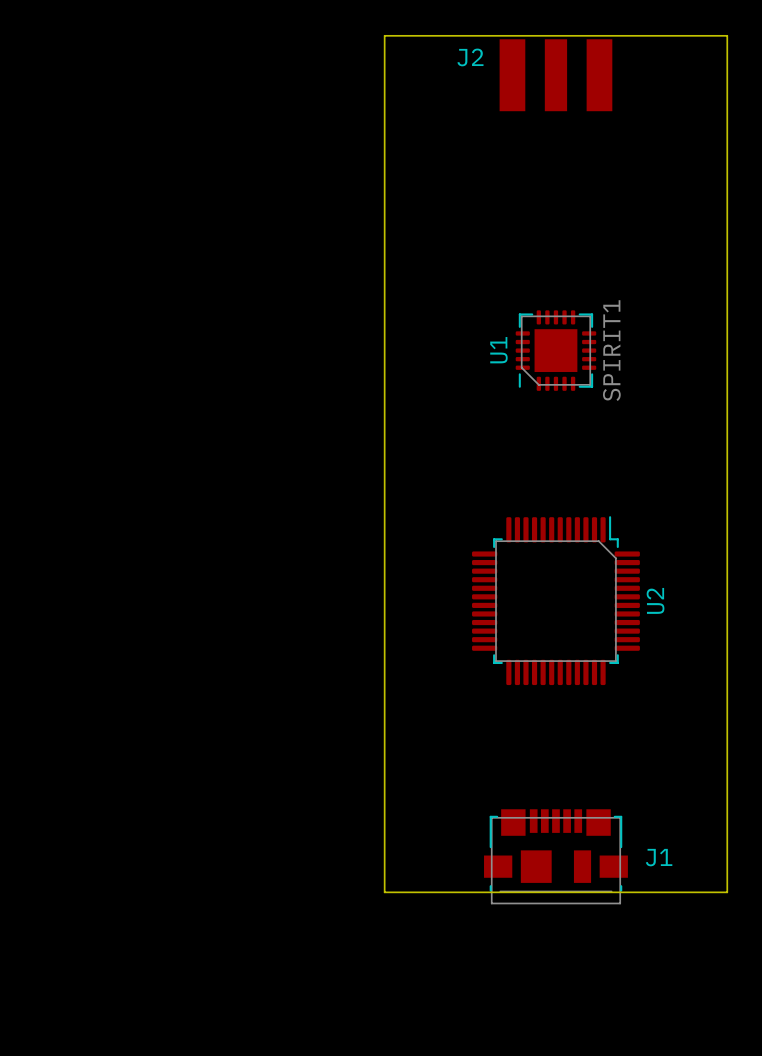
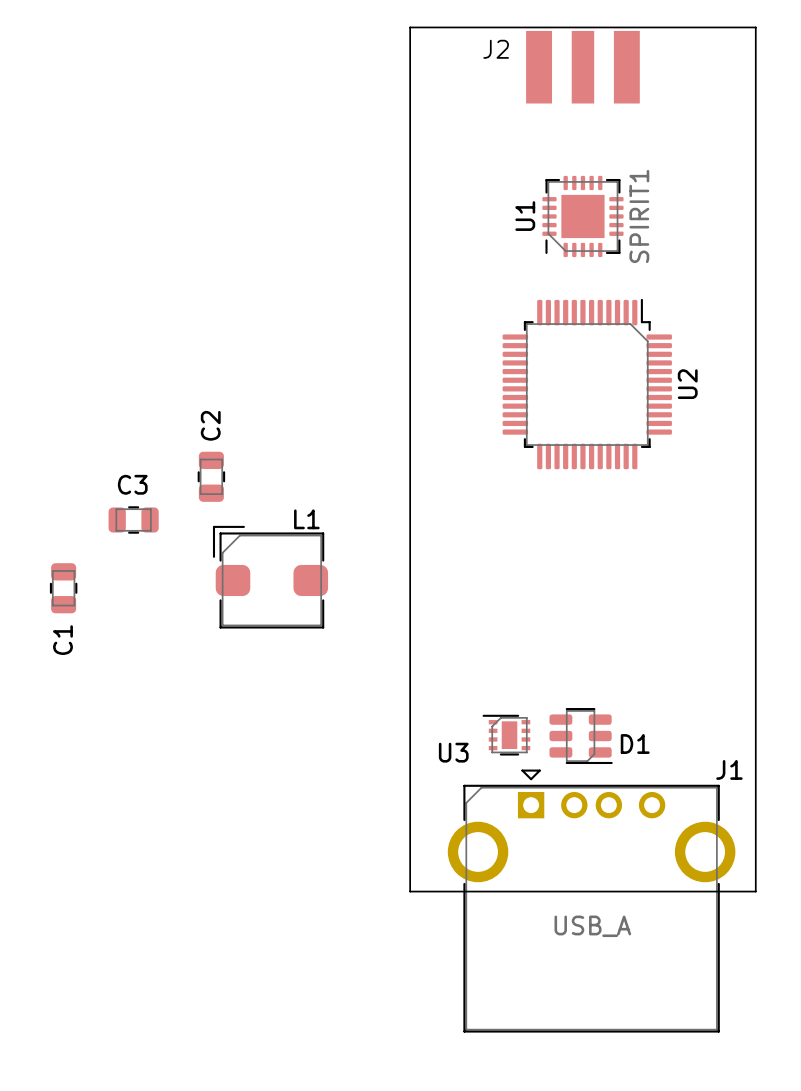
U1 position: (555, 350) -> (582, 216)
C2: none -> (211, 476)
C3: none -> (133, 519)
L1: none -> (270, 577)
C1: none -> (63, 588)
U2 position: (555, 600) -> (587, 384)
U3: none -> (506, 735)
D1: none -> (581, 736)
J1 footprint: [484, 809, 628, 905] -> [447, 769, 736, 1033]
J1 name position: J1 (659, 857) -> J1 (729, 769)
J1 value: none -> USB_A (592, 926)

